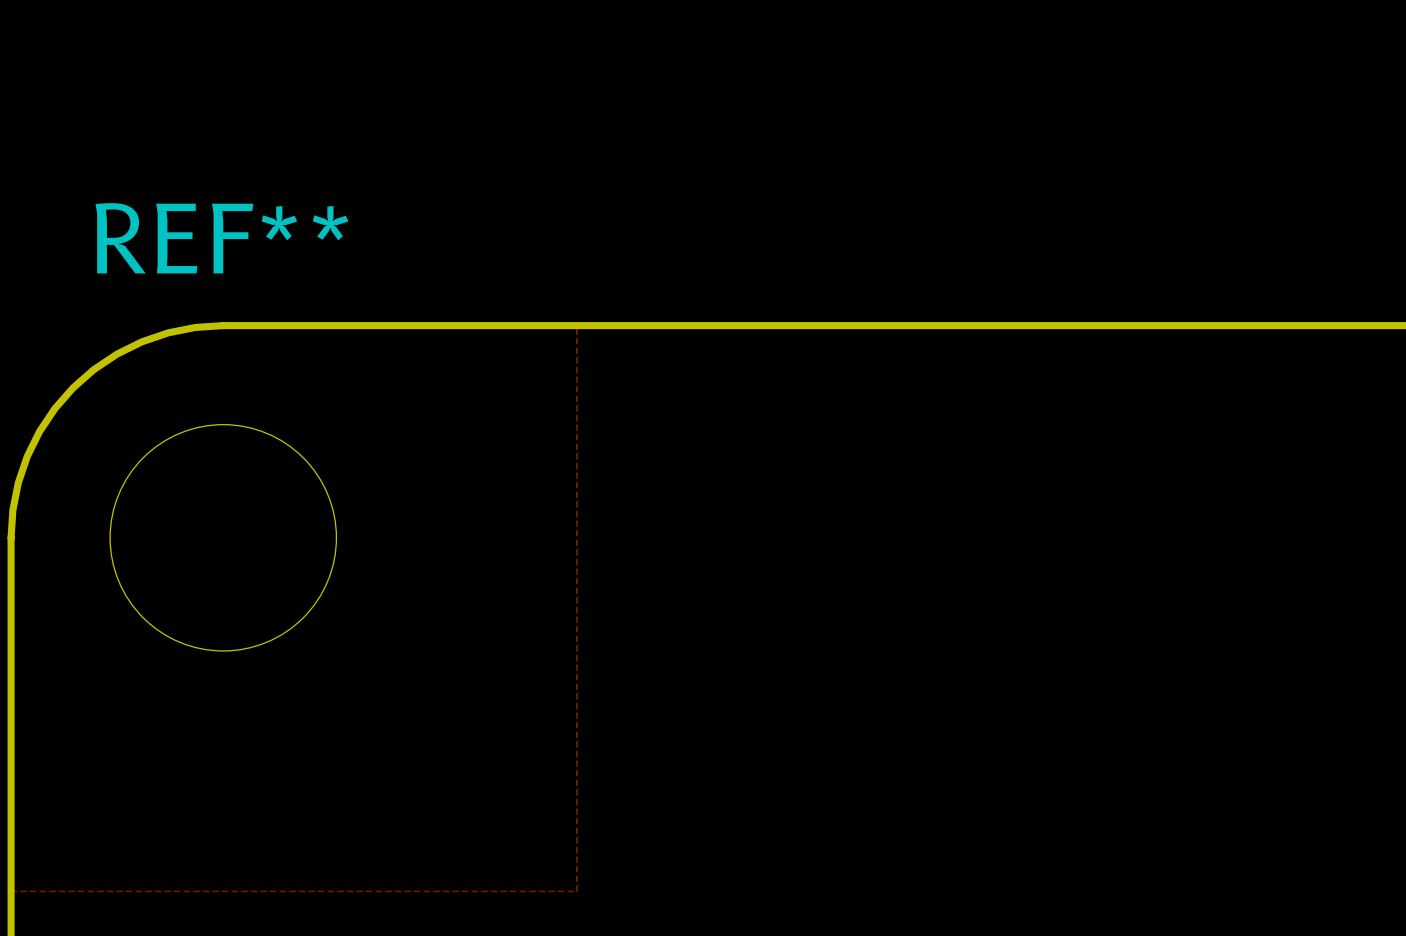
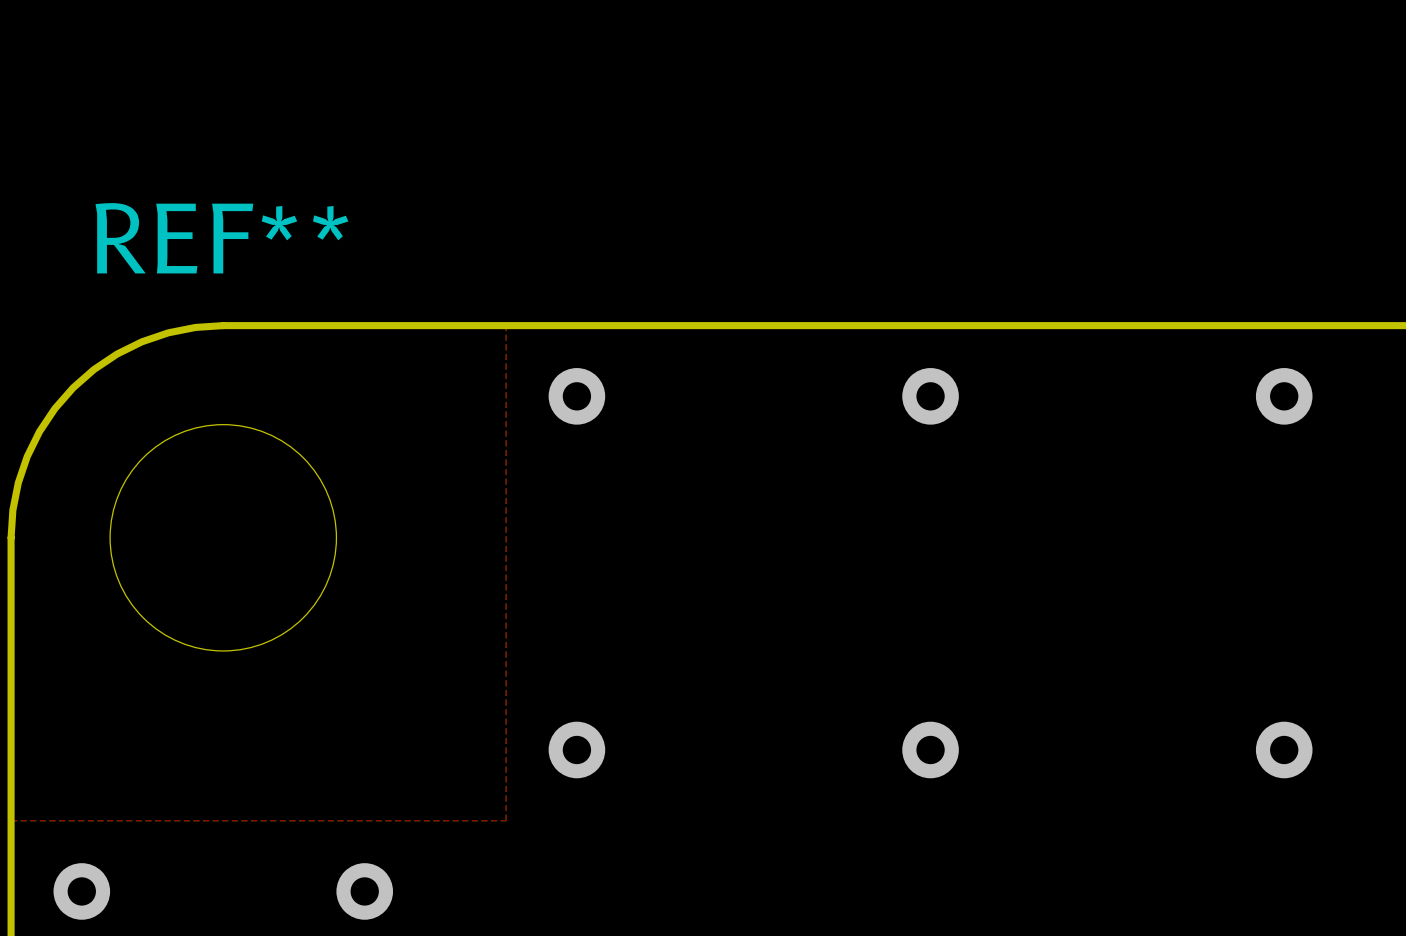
top zone outline: (576, 325) (576, 891) (11, 891) -> (576, 325) (506, 325) (506, 820) (11, 820) (11, 891)
via: none -> (576, 396)
via: none -> (930, 396)
via: none -> (1284, 396)
via: none -> (576, 749)
via: none -> (930, 749)
via: none -> (1284, 749)
via: none -> (81, 891)
via: none -> (364, 891)

